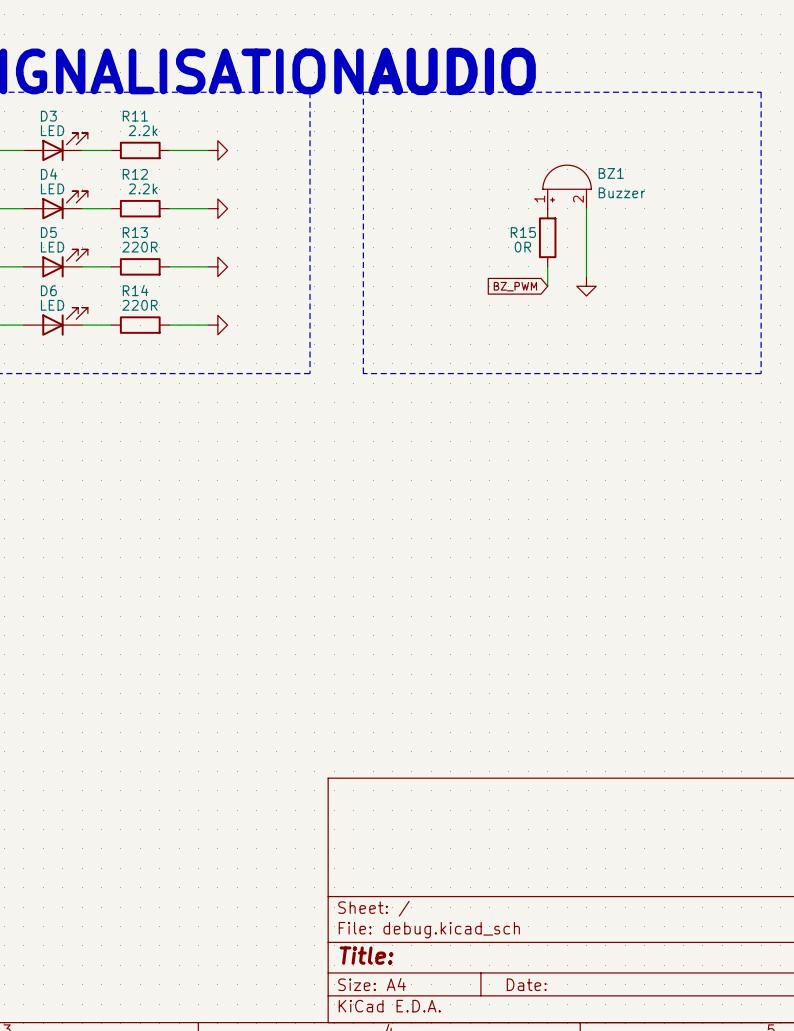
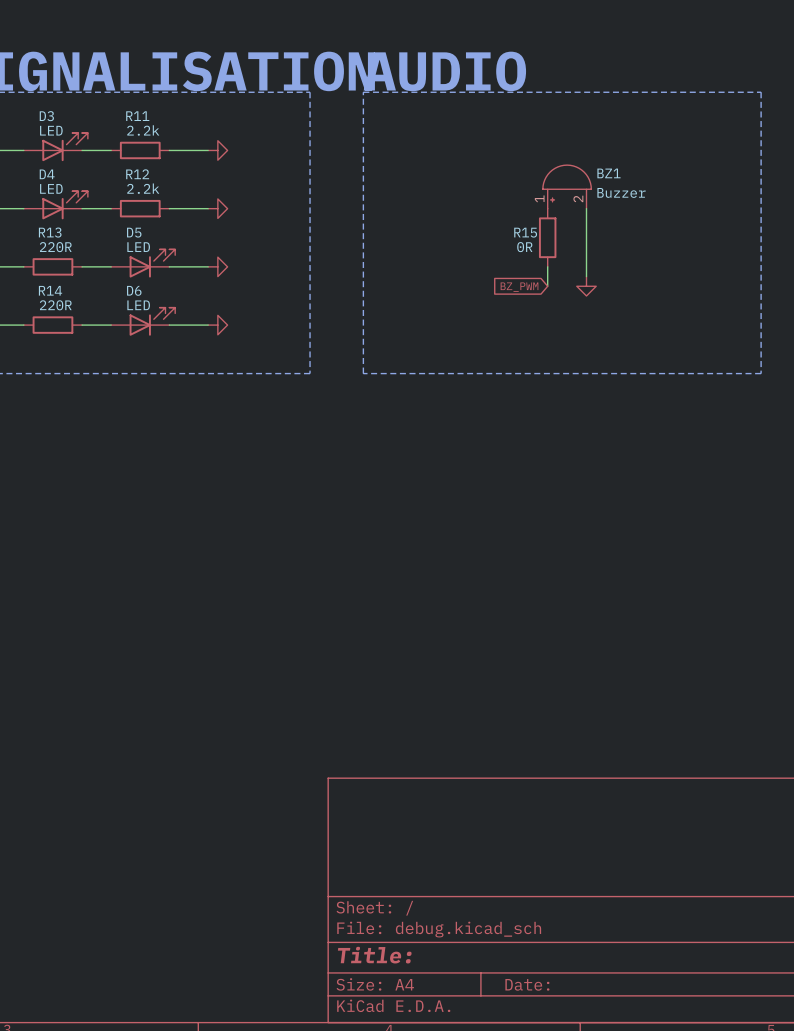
D5 position: (55, 263) -> (143, 263)
R13 position: (140, 266) -> (52, 266)
D6 position: (55, 321) -> (143, 321)
R14 position: (140, 325) -> (52, 325)

